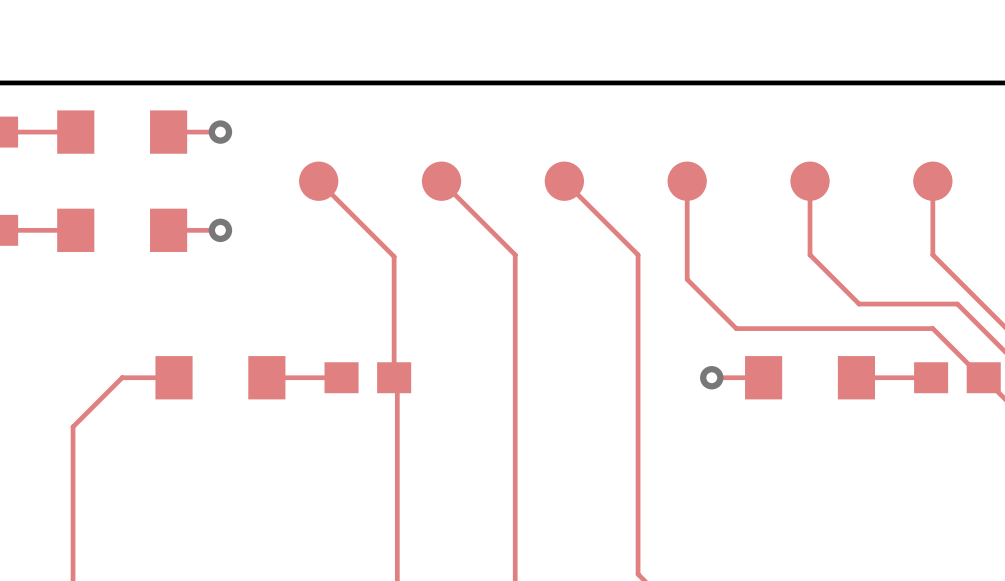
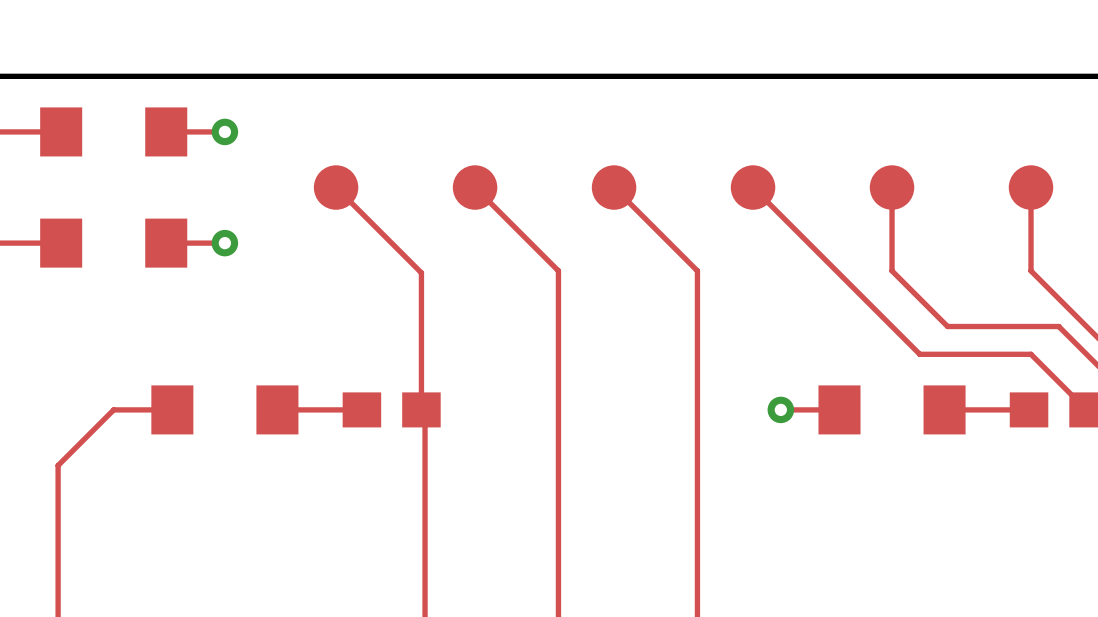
top track: (687, 181) (687, 279) (736, 328) (834, 328) -> (753, 187) (919, 354)

